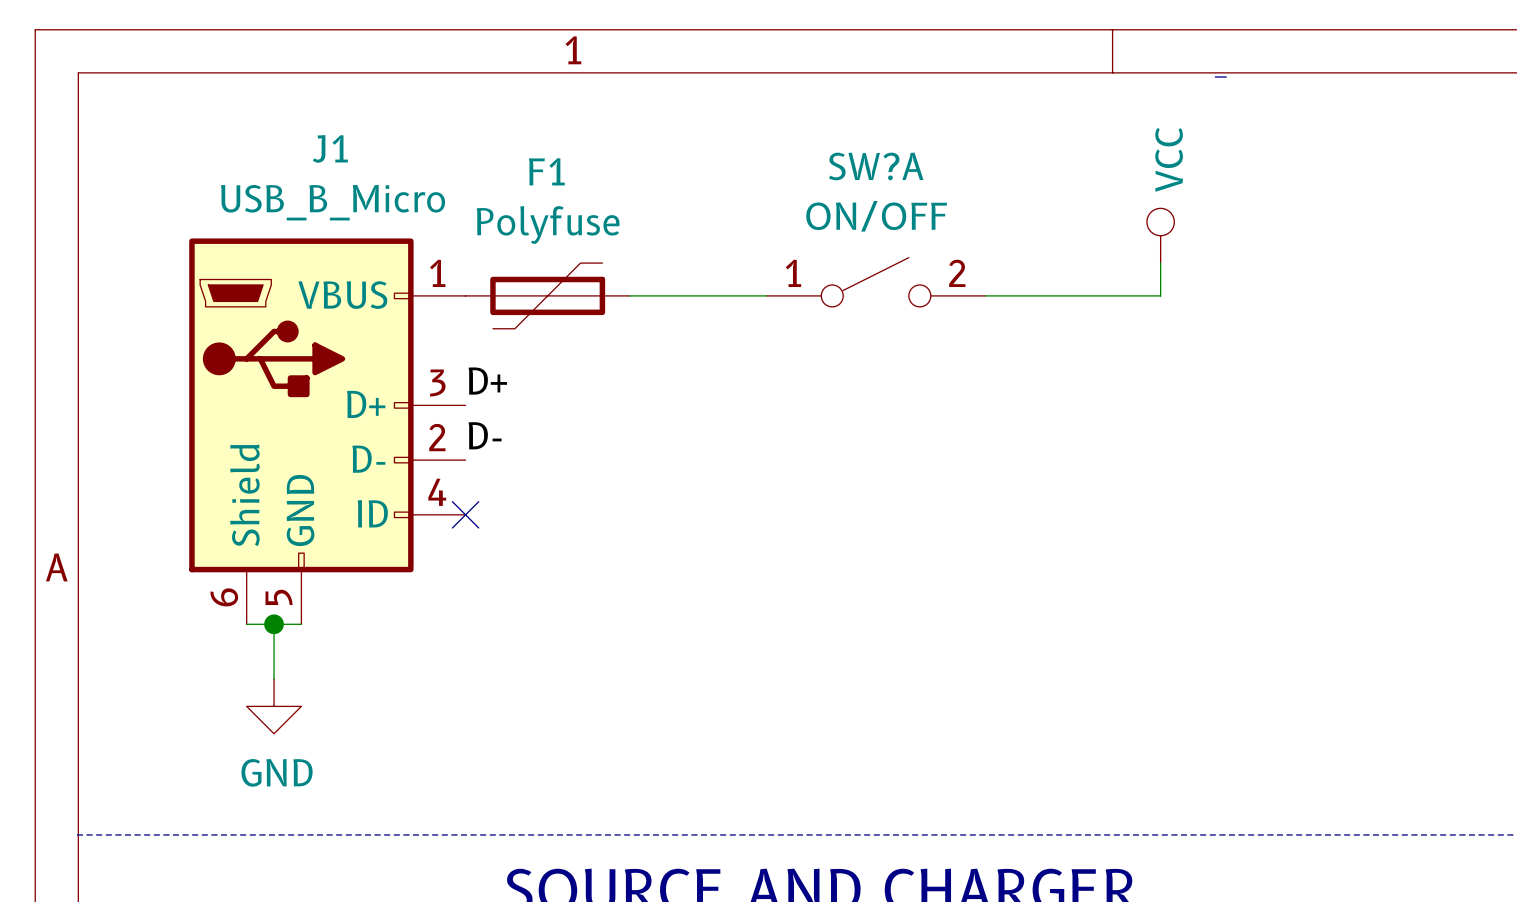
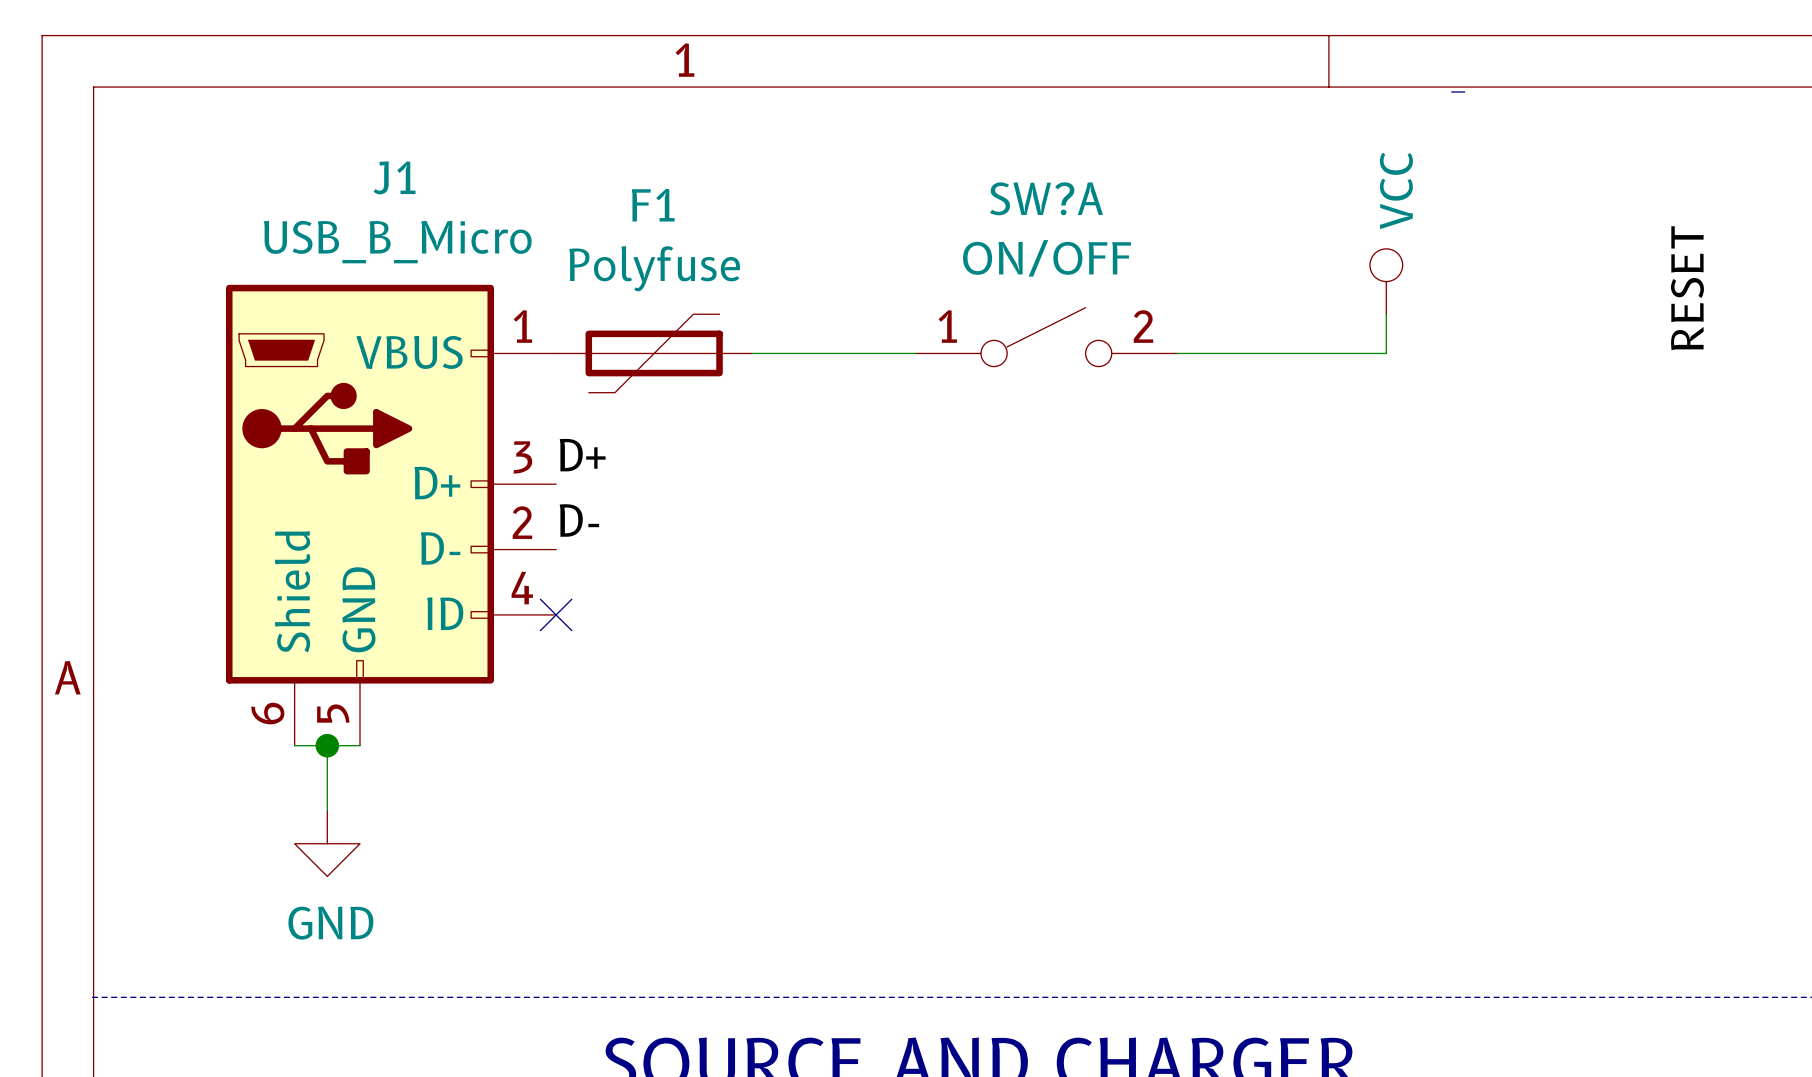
label: none -> RESET (1687, 288)

